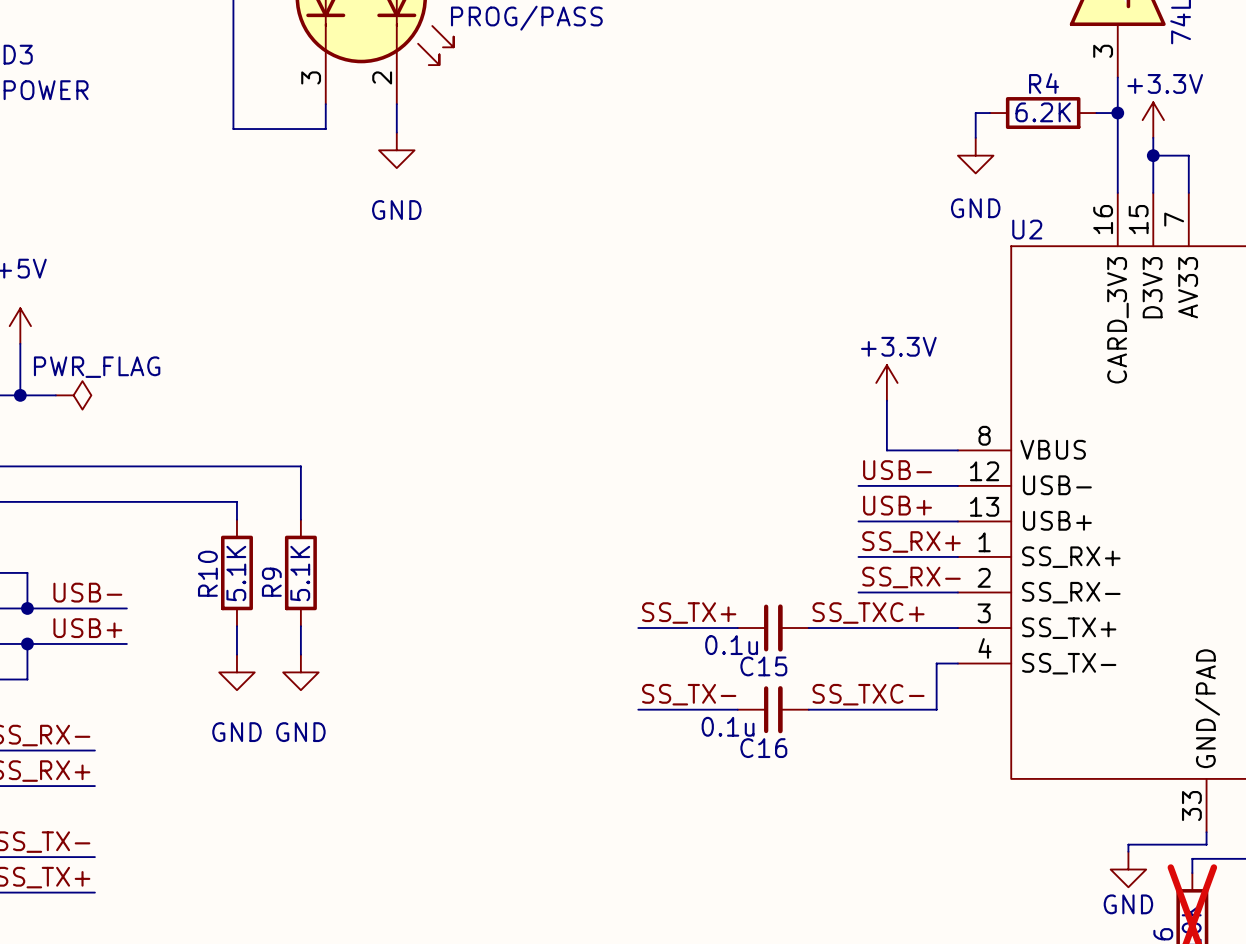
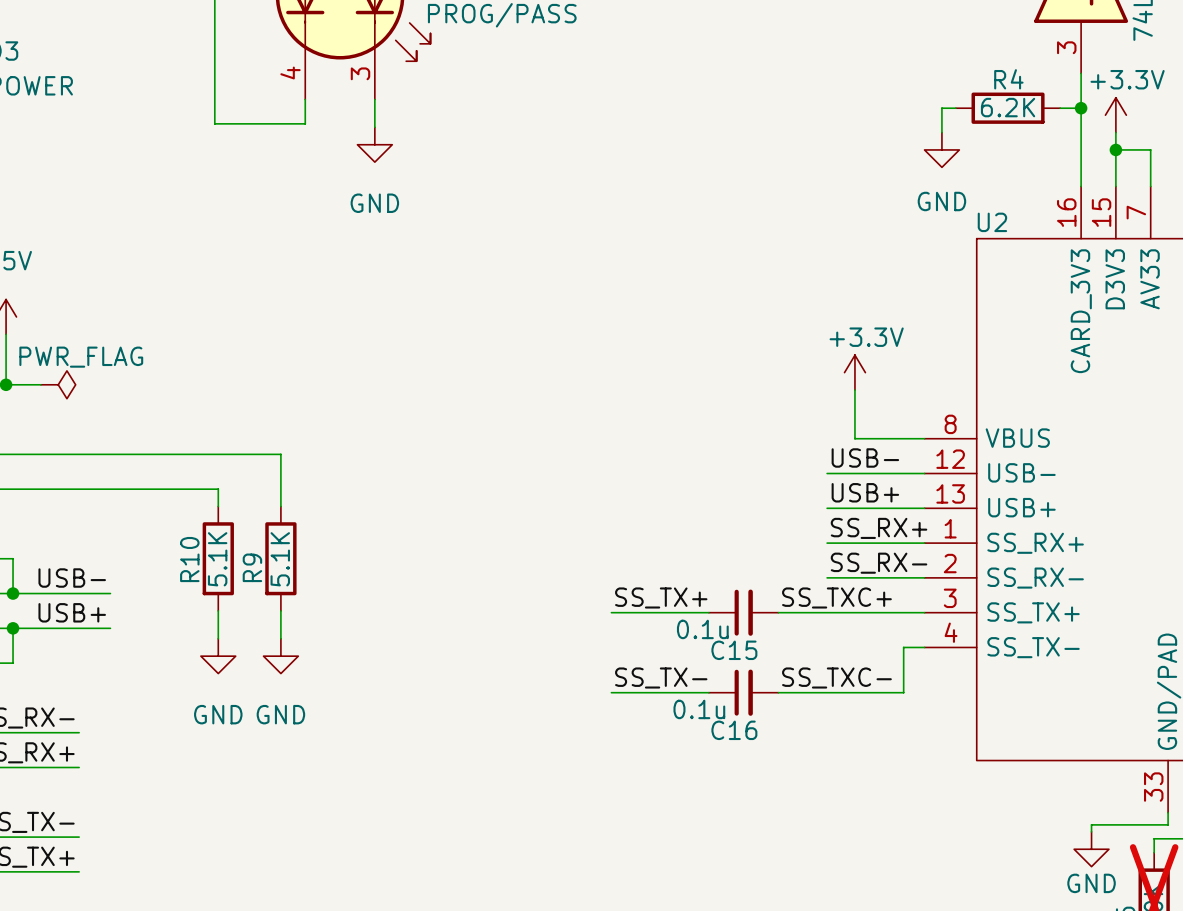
part pin number: 3 (311, 77) -> 4 (290, 73)
part pin number: 2 (382, 77) -> 3 (360, 73)

